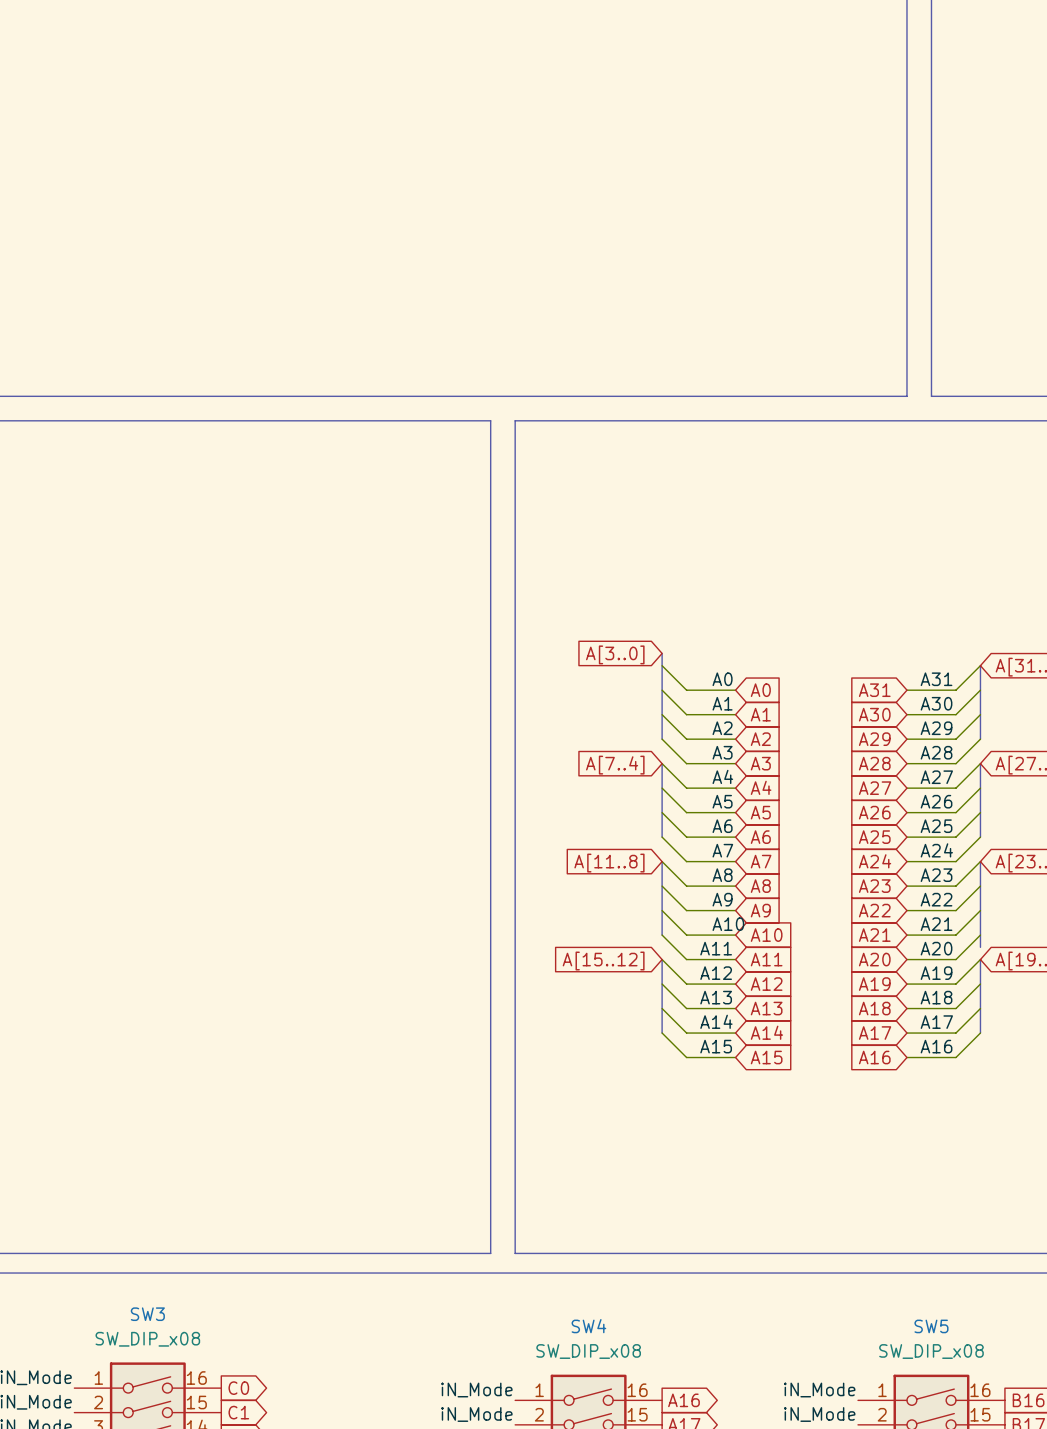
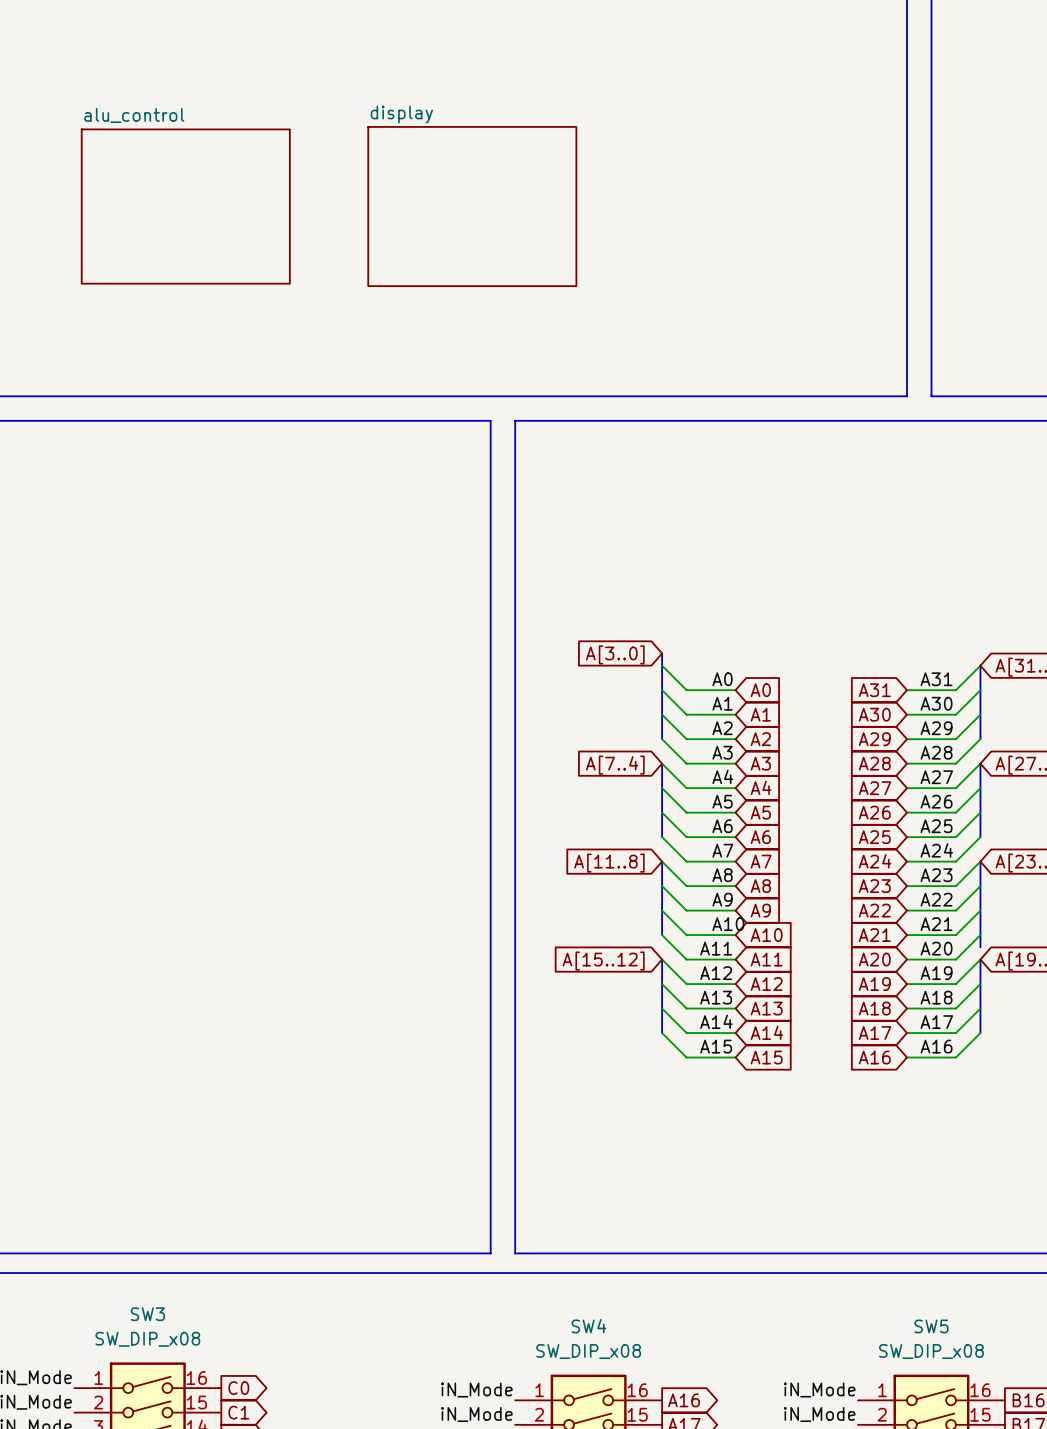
sheet alu_control: none -> (185, 206)
sheet display: none -> (472, 206)

